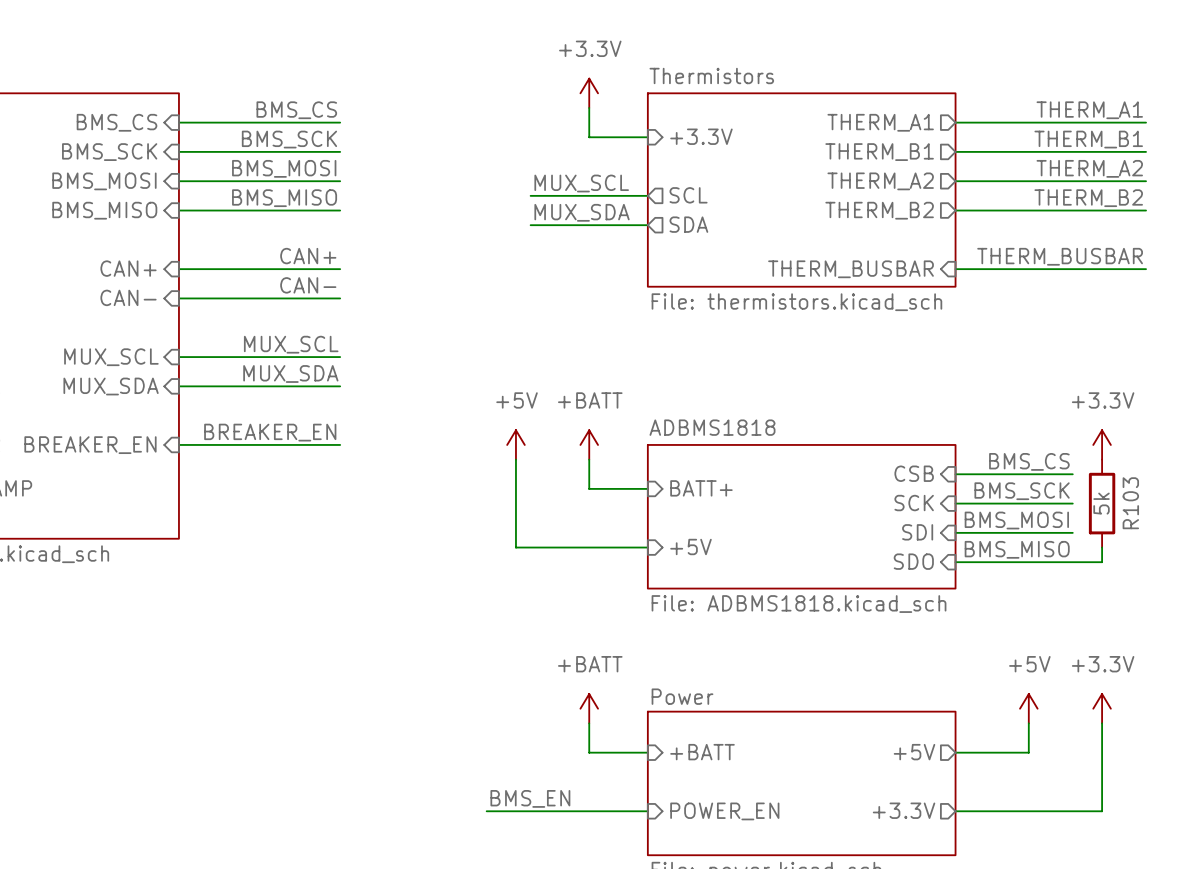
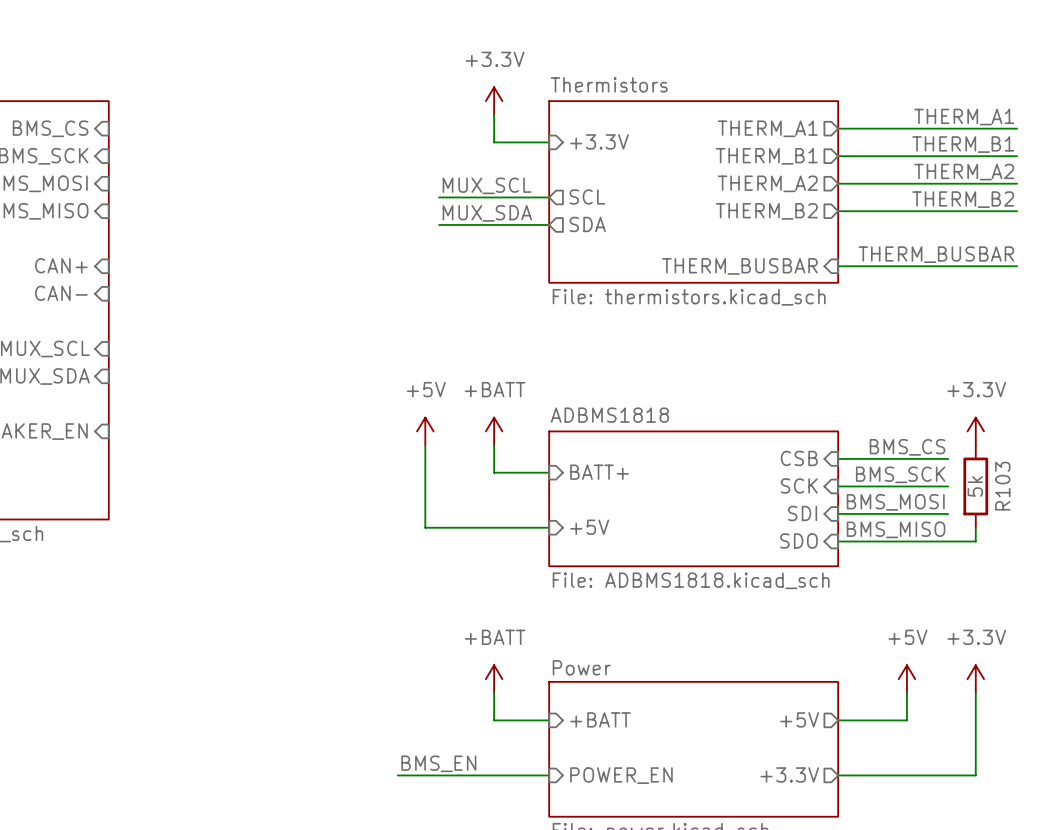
label: BMS_CS (296, 110) -> none
wire: (178, 122) (340, 122) -> none
label: BMS_SCK (289, 139) -> none
wire: (178, 151) (340, 151) -> none
label: BMS_MOSI (284, 168) -> none
wire: (178, 181) (340, 181) -> none
label: BMS_MISO (284, 198) -> none
wire: (178, 210) (340, 210) -> none
label: CAN+ (308, 256) -> none
wire: (178, 269) (340, 269) -> none
label: CAN- (308, 285) -> none
wire: (178, 298) (340, 298) -> none
label: MUX_SCL (291, 344) -> none
wire: (178, 357) (340, 357) -> none
label: MUX_SDA (290, 373) -> none
wire: (178, 386) (340, 386) -> none
label: BREAKER_EN (270, 432) -> none
wire: (178, 444) (340, 444) -> none

